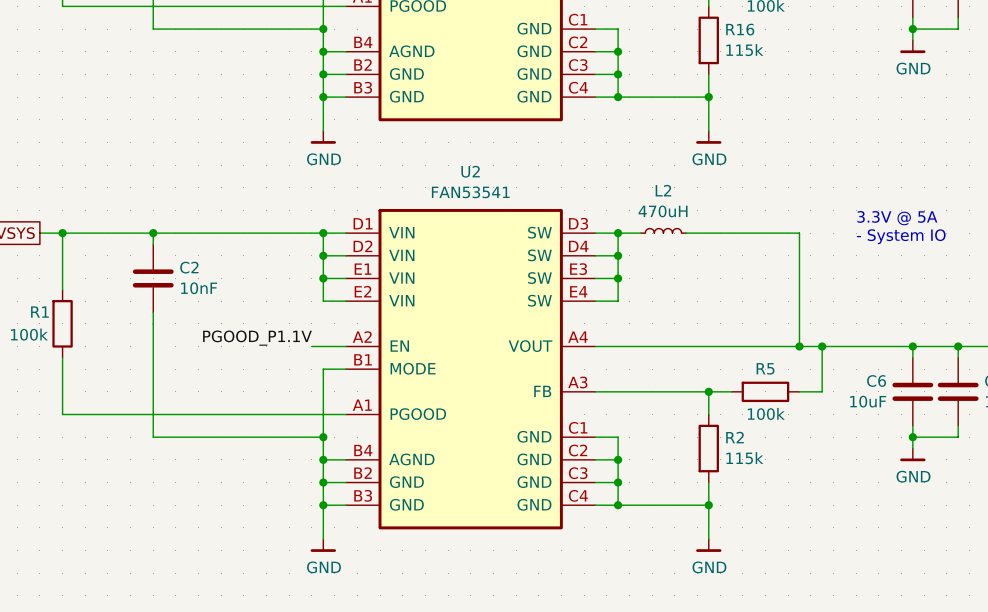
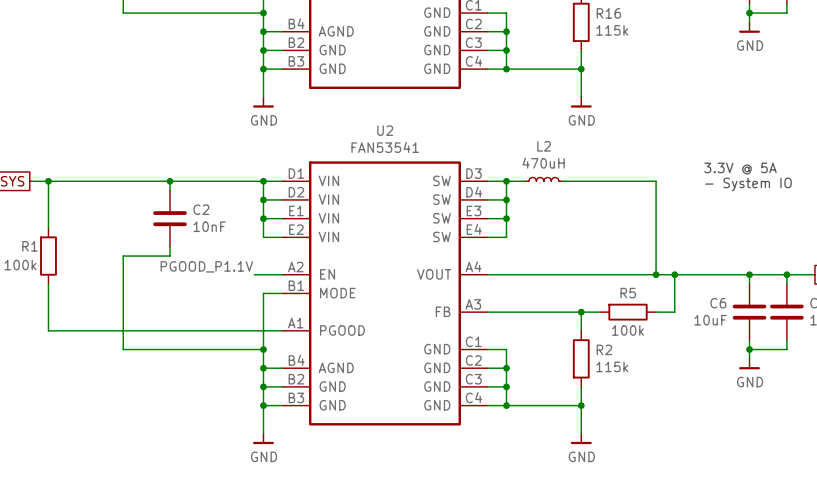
wire: (153, 233) (153, 244) -> (170, 181) (170, 190)
junction: (153, 233) -> none
junction: none -> (170, 181)
C2 position: (153, 278) -> (170, 218)
wire: (153, 312) (153, 323) -> (170, 246) (170, 256) (123, 256)

